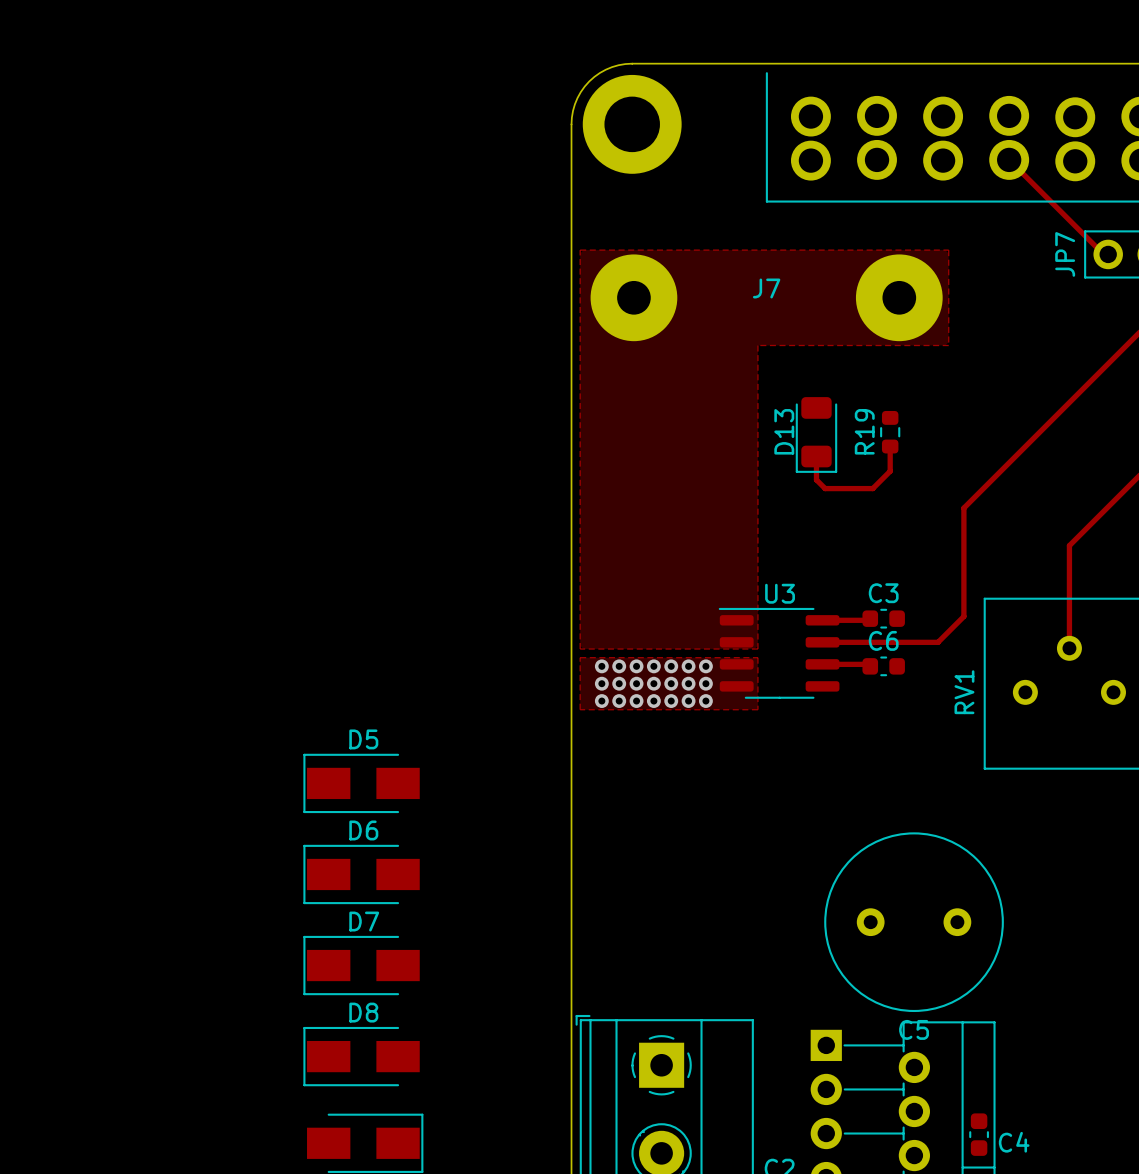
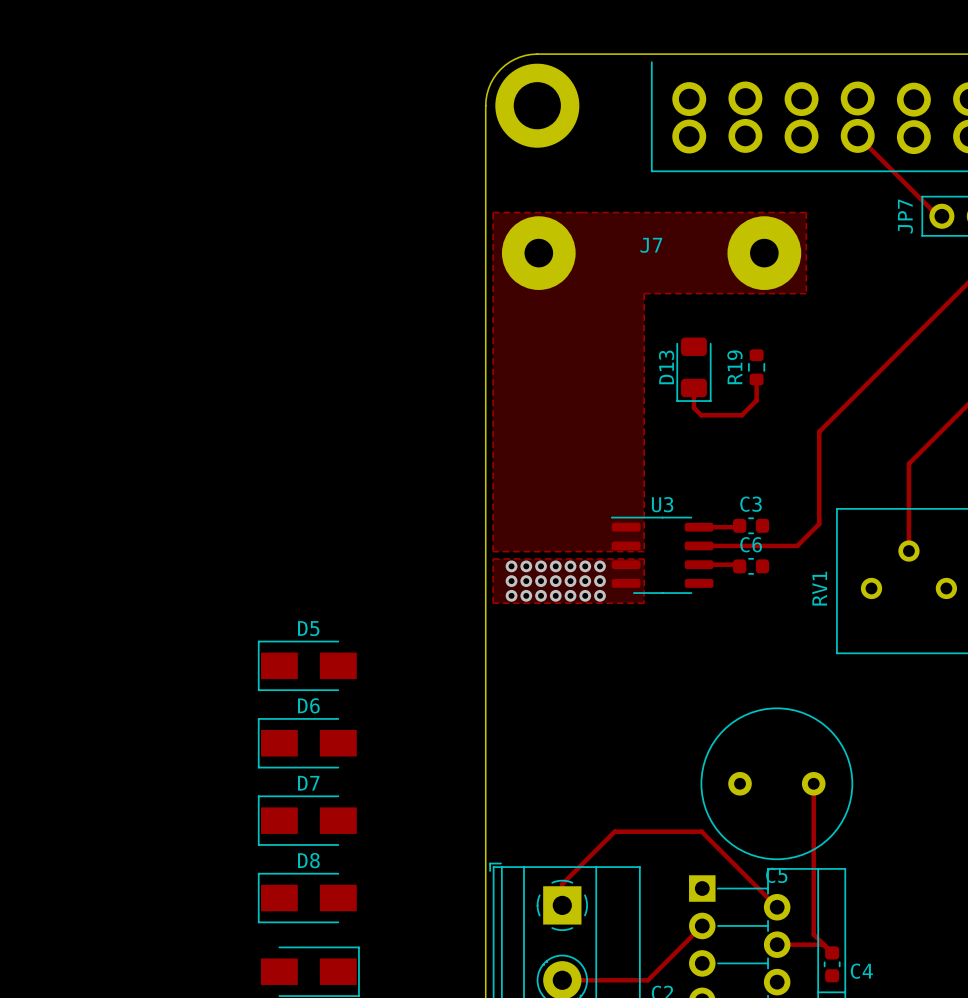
track: none -> (813, 783) (813, 934) (832, 952)
track: none -> (562, 905) (562, 884) (614, 831) (701, 831) (777, 907)
track: none -> (702, 925) (647, 980) (562, 980)
track: none -> (777, 944) (823, 944)

